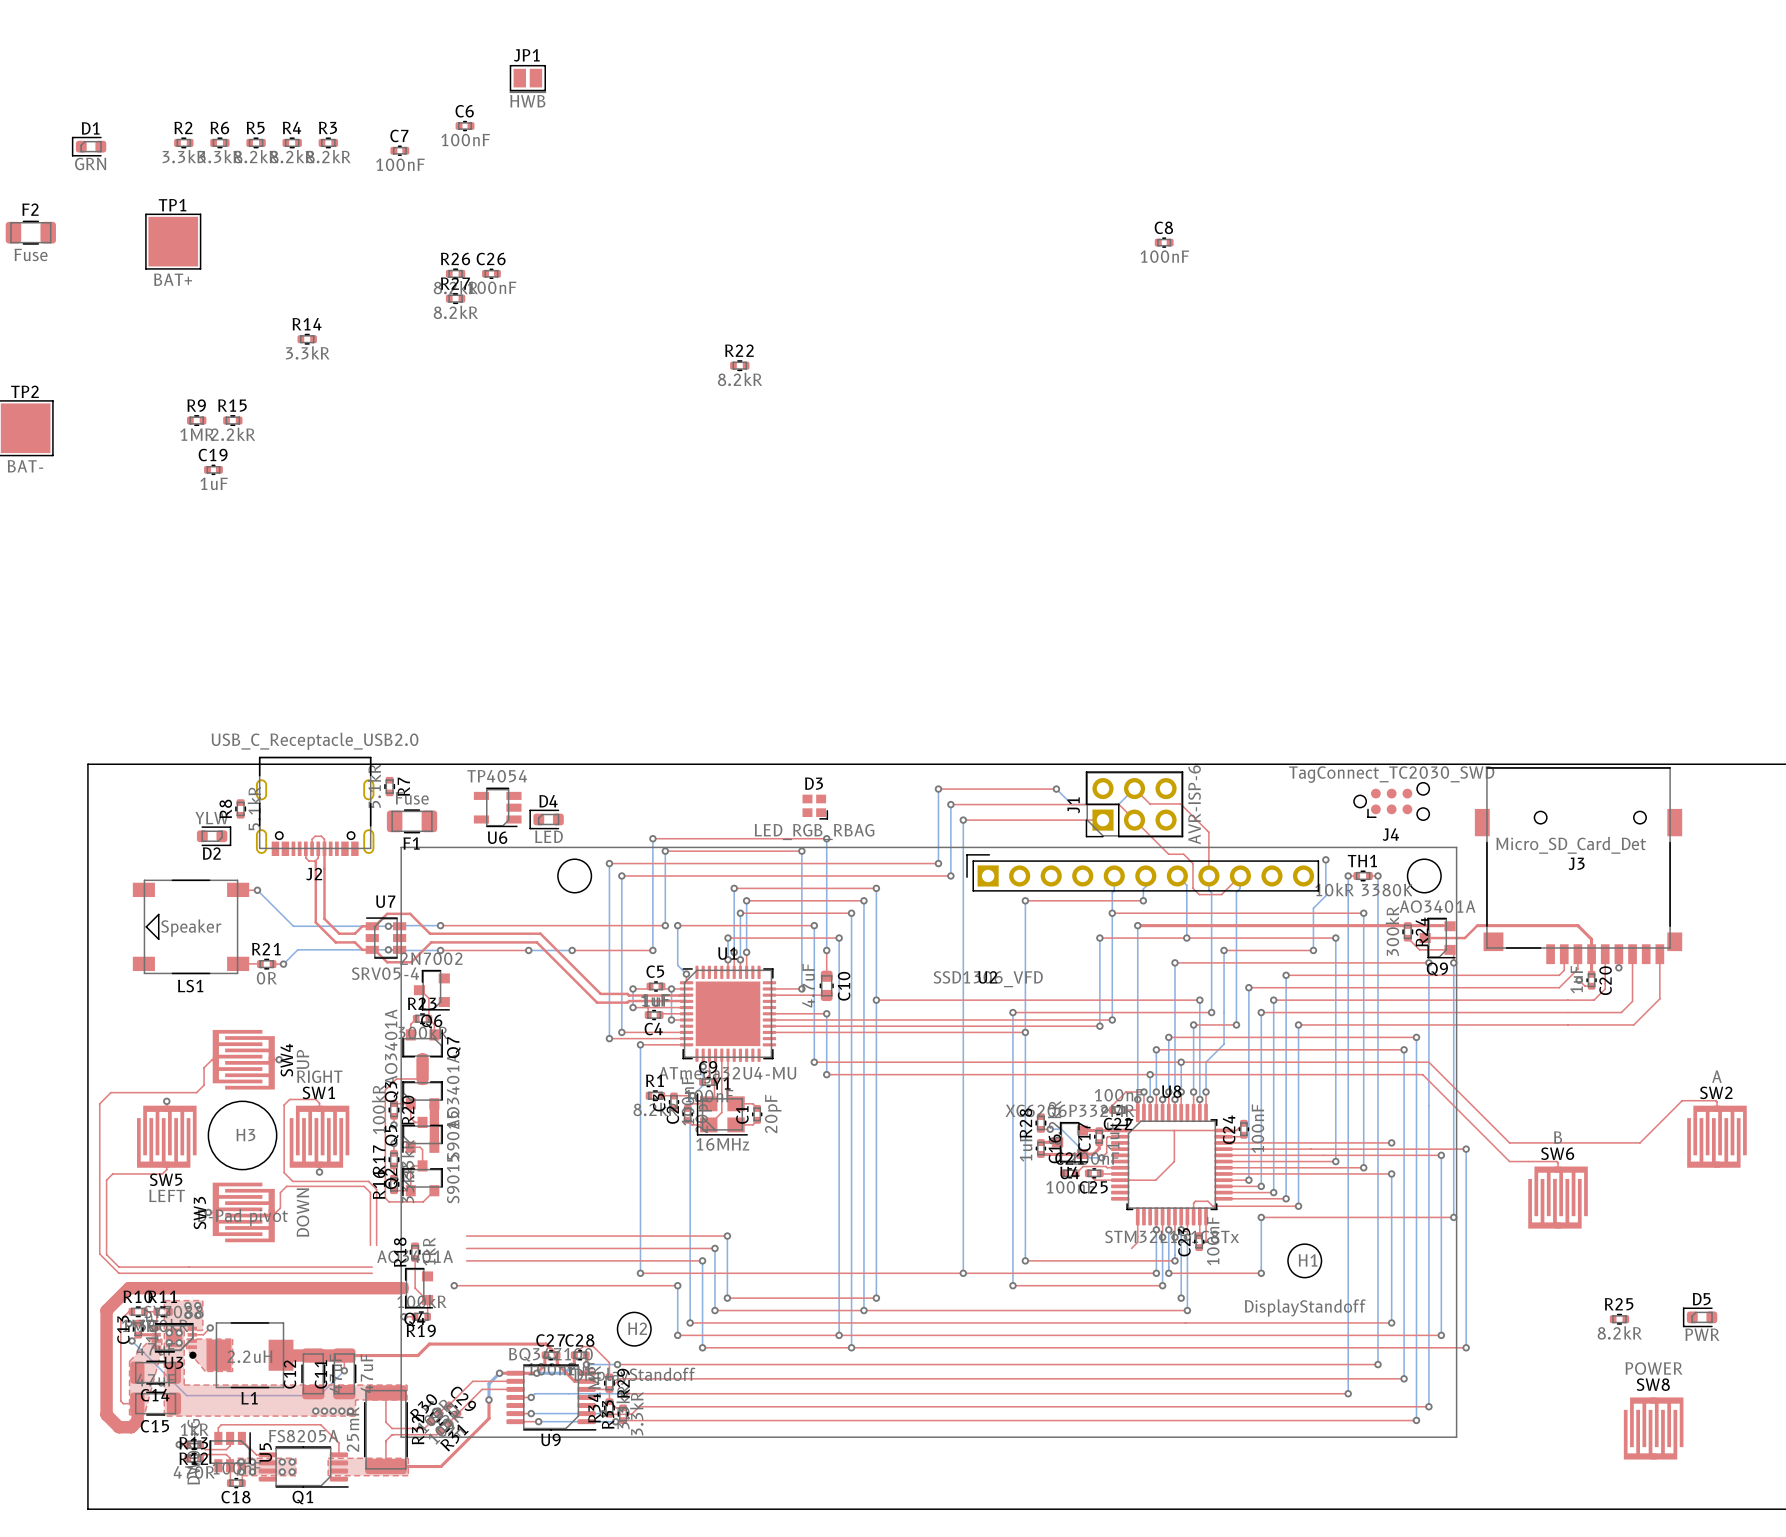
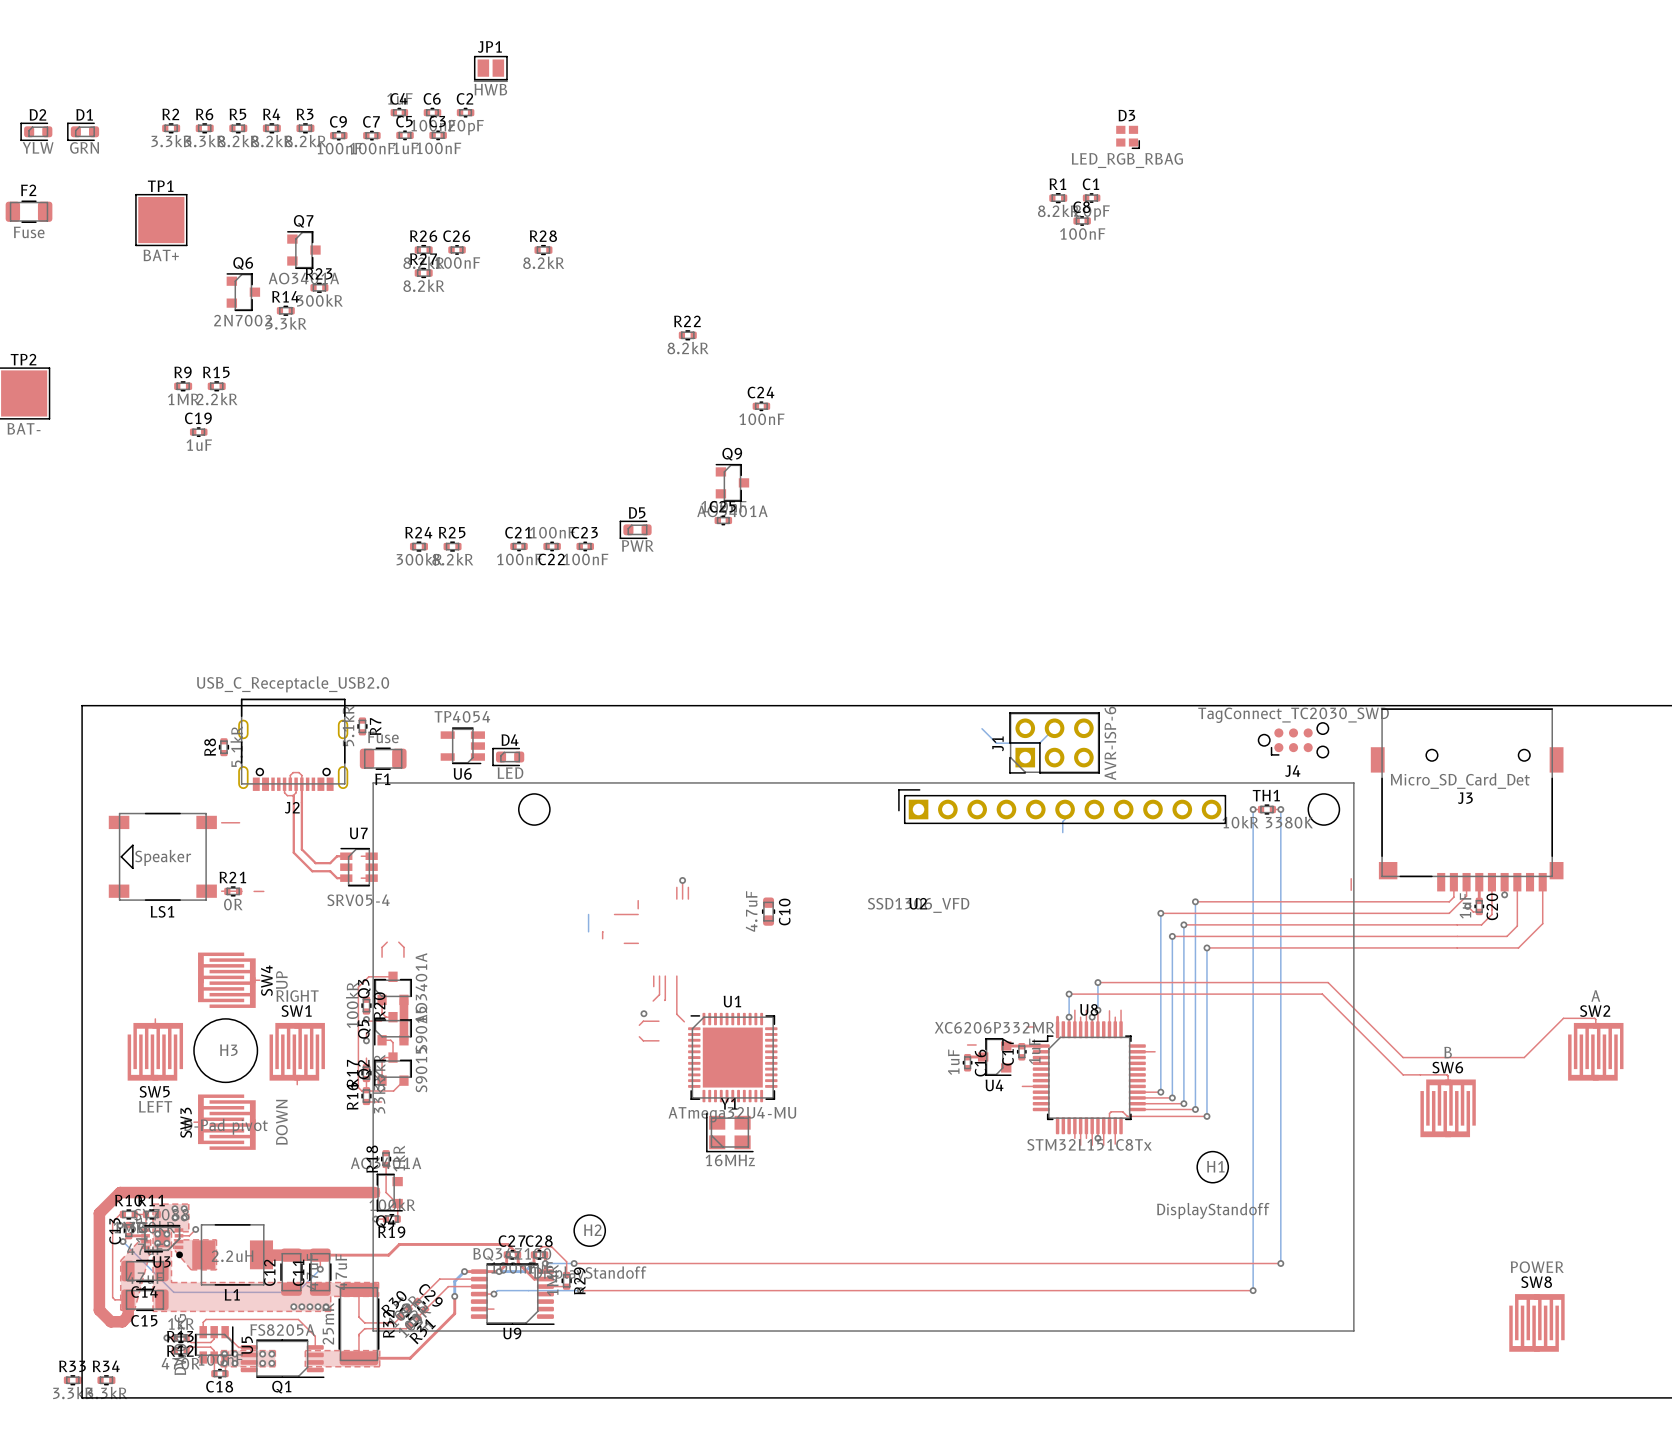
top track: (1134, 788) (1149, 803) (1180, 803) (1208, 832) (1208, 875) -> none
top track: (938, 789) (1056, 789) -> none
bottom track: (938, 789) (938, 863) -> none
via: (938, 789) -> none
via: (1056, 789) -> none
top track: (950, 804) (1119, 804) (1168, 854) (1183, 854) (1193, 863) (1193, 888) (1199, 894) (1221, 894) (1240, 875) -> none
bottom track: (950, 804) (950, 875) -> none
via: (950, 804) -> none
D3 position: (815, 807) -> (1128, 137)
top track: (963, 820) (1102, 820) -> none
bottom track: (963, 820) (963, 1273) -> none
via: (963, 820) -> none
D2 rotation: 0° (214, 836) -> 180° (36, 131)
D2 position: (214, 836) -> (36, 131)
top track: (652, 838) (826, 838) -> none
bottom track: (652, 838) (652, 950) -> none
via: (652, 838) -> none
bottom track: (826, 838) (826, 950) -> none
via: (826, 838) -> none
top track: (665, 851) (801, 851) -> none
bottom track: (665, 851) (665, 925) -> none
via: (665, 851) -> none
bottom track: (801, 851) (801, 988) -> none
via: (801, 851) -> none
bottom track: (1325, 859) (1325, 895) (1313, 908) (1313, 950) -> none
via: (1325, 859) -> none
top track: (609, 863) (938, 863) -> none
bottom track: (609, 863) (609, 1038) -> none
via: (609, 863) -> none
via: (938, 863) -> none
top track: (621, 875) (950, 875) -> none
bottom track: (621, 875) (621, 1032) -> none
via: (621, 875) -> none
via: (950, 875) -> none
bottom track: (1114, 875) (1114, 890) (1112, 892) (1112, 1020) -> none
bottom track: (1177, 875) (1186, 885) (1186, 938) -> none
bottom track: (1208, 875) (1208, 890) (1211, 892) (1211, 1012) -> none
bottom track: (1240, 875) (1240, 888) (1236, 892) (1236, 1024) -> none
top track: (734, 888) (876, 888) -> none
bottom track: (734, 888) (734, 952) -> none
via: (734, 888) -> none
bottom track: (876, 888) (876, 1298) -> none
via: (876, 888) -> none
bottom track: (257, 890) (293, 926) (440, 925) -> none
via: (257, 890) -> none
top track: (746, 900) (863, 900) -> none
bottom track: (746, 900) (746, 952) -> none
via: (746, 900) -> none
bottom track: (863, 900) (863, 1310) -> none
via: (863, 900) -> none
top track: (1025, 900) (1143, 900) -> none
bottom track: (1025, 900) (1025, 1260) -> none
via: (1025, 900) -> none
via: (1143, 900) -> none
top track: (740, 913) (851, 913) -> none
bottom track: (740, 913) (740, 959) -> none
via: (740, 913) -> none
bottom track: (851, 913) (851, 1347) -> none
via: (851, 913) -> none
top track: (1112, 913) (1363, 913) -> none
via: (1112, 913) -> none
bottom track: (1363, 913) (1363, 1167) -> none
via: (1363, 913) -> none
top track: (440, 925) (665, 925) -> none
via: (440, 925) -> none
via: (665, 925) -> none
top track: (677, 925) (814, 925) -> none
bottom track: (677, 925) (677, 965) (686, 974) -> none
via: (677, 925) -> none
bottom track: (814, 925) (814, 1062) -> none
via: (814, 925) -> none
top track: (1137, 925) (1450, 926) -> none
bottom track: (1137, 925) (1137, 1099) -> none
via: (1137, 925) -> none
LS1 position: (191, 926) -> (162, 856)
top track: (372, 926) (374, 926) (387, 913) (410, 913) (430, 933) (540, 933) (600, 993) (687, 995) -> none
via: (388, 926) -> none
R24 rotation: 0° (1407, 931) -> 90° clockwise (418, 546)
R24 position: (1407, 931) -> (418, 546)
top track: (728, 938) (839, 938) -> none
bottom track: (728, 938) (728, 959) -> none
via: (728, 938) -> none
bottom track: (839, 938) (839, 1335) -> none
via: (839, 938) -> none
top track: (1099, 938) (1335, 938) -> none
bottom track: (1099, 938) (1099, 1026) -> none
via: (1099, 938) -> none
via: (1186, 938) -> none
bottom track: (1335, 938) (1335, 1161) -> none
via: (1335, 938) -> none
top track: (1407, 938) (1419, 949) (1450, 949) -> none
top track: (1425, 938) (1464, 938) (1477, 925) (1577, 925) (1591, 939) (1591, 954) -> none
Q9 rotation: 0° (1437, 938) -> 180° (732, 482)
Q9 position: (1437, 938) -> (732, 482)
top track: (372, 949) (374, 949) (387, 962) (411, 962) (431, 942) (536, 942) (597, 1002) (686, 1001) -> none
via: (388, 949) -> none
top track: (440, 950) (528, 950) -> none
bottom track: (440, 950) (297, 949) (283, 964) -> none
via: (440, 950) -> none
bottom track: (528, 950) (572, 950) -> none
via: (528, 950) -> none
top track: (572, 950) (652, 950) -> none
via: (572, 950) -> none
via: (652, 950) -> none
top track: (826, 950) (826, 976) -> none
via: (826, 950) -> none
top track: (1224, 950) (1313, 950) -> none
bottom track: (1224, 950) (1224, 1044) (1206, 1062) (1206, 1092) -> none
via: (1224, 950) -> none
via: (1313, 950) -> none
top track: (746, 952) (746, 972) -> none
via: (746, 952) -> none
via: (728, 959) -> none
via: (740, 959) -> none
top track: (1175, 962) (1428, 962) -> none
bottom track: (1175, 962) (1175, 1099) -> none
via: (1175, 962) -> none
bottom track: (1428, 962) (1428, 1406) -> none
via: (1428, 962) -> none
bottom track: (1453, 962) (1453, 1217) -> none
via: (1453, 962) -> none
R21 position: (266, 964) -> (233, 891)
via: (283, 964) -> none
via: (686, 974) -> none
C5 position: (656, 986) -> (405, 135)
top track: (633, 988) (650, 988) -> none
via: (633, 988) -> none
bottom track: (671, 988) (671, 1020) -> none
via: (671, 988) -> none
top track: (769, 988) (801, 988) -> none
via: (801, 988) -> none
top track: (420, 990) (428, 998) (428, 1018) -> none
Q6 rotation: 0° (431, 990) -> 180° (243, 292)
Q6 position: (431, 990) -> (243, 292)
top track: (769, 995) (826, 995) -> none
top track: (876, 1000) (1199, 1000) -> none
via: (876, 1000) -> none
bottom track: (1199, 1000) (1199, 1099) -> none
via: (1199, 1000) -> none
top track: (633, 1007) (686, 1007) -> none
via: (633, 1007) -> none
top track: (1012, 1012) (1211, 1012) -> none
bottom track: (1012, 1012) (1012, 1285) -> none
via: (1012, 1012) -> none
via: (1211, 1012) -> none
top track: (660, 1013) (686, 1013) -> none
U1 position: (728, 1013) -> (732, 1057)
top track: (769, 1013) (826, 1013) -> none
bottom track: (826, 1013) (826, 1074) -> none
via: (826, 1013) -> none
C4 position: (654, 1015) -> (399, 112)
R23 position: (422, 1018) -> (319, 287)
via: (671, 1020) -> none
top track: (769, 1020) (1112, 1020) -> none
via: (1112, 1020) -> none
top track: (1193, 1024) (1236, 1024) -> none
bottom track: (1193, 1024) (1193, 1092) -> none
via: (1193, 1024) -> none
via: (1236, 1024) -> none
top track: (769, 1026) (1099, 1026) -> none
via: (1099, 1026) -> none
C4 name position: C4 (653, 1029) -> C4 (398, 98)
top track: (621, 1032) (686, 1032) -> none
via: (621, 1032) -> none
top track: (769, 1032) (1025, 1032) -> none
via: (1025, 1032) -> none
top track: (1168, 1037) (1416, 1037) -> none
bottom track: (1168, 1037) (1168, 1092) -> none
via: (1168, 1037) -> none
bottom track: (1416, 1037) (1416, 1420) -> none
via: (1416, 1037) -> none
top track: (609, 1038) (686, 1038) -> none
via: (609, 1038) -> none
top track: (640, 1044) (686, 1044) -> none
bottom track: (640, 1044) (640, 1273) -> none
via: (640, 1044) -> none
Q7 rotation: 0° (422, 1047) -> 90° counterclockwise (303, 250)
Q7 position: (422, 1047) -> (303, 250)
top track: (1156, 1049) (1404, 1049) -> none
bottom track: (1156, 1049) (1156, 1092) -> none
via: (1156, 1049) -> none
bottom track: (1404, 1049) (1404, 1378) -> none
via: (1404, 1049) -> none
top track: (721, 1055) (721, 1112) (708, 1125) -> none
top track: (215, 1059) (212, 1059) (204, 1067) (204, 1085) (196, 1092) (110, 1092) (99, 1103) (99, 1254) (118, 1273) (372, 1273) -> none
via: (279, 1059) -> none
top track: (422, 1059) (422, 1078) (396, 1078) (385, 1090) -> (393, 976) (368, 976) (358, 987) (358, 1008)
top track: (814, 1062) (1181, 1062) -> none
via: (814, 1062) -> none
bottom track: (703, 1066) (703, 1085) (690, 1098) (690, 1322) -> none
via: (703, 1066) -> none
top track: (826, 1074) (1150, 1074) -> none
via: (826, 1074) -> none
C9 position: (708, 1082) -> (338, 135)
top track: (714, 1082) (714, 1104) -> none
Q3 position: (422, 1091) -> (393, 988)
via: (1143, 1092) -> none
via: (1156, 1092) -> none
via: (1168, 1092) -> none
via: (1193, 1092) -> none
via: (1206, 1092) -> none
R1 position: (655, 1095) -> (1058, 198)
top track: (661, 1095) (692, 1095) -> none
via: (1137, 1099) -> none
via: (1162, 1099) -> none
via: (1199, 1099) -> none
via: (166, 1101) -> none
C3 rotation: 0° (674, 1101) -> 90° clockwise (438, 135)
C3 position: (674, 1101) -> (438, 135)
top track: (410, 1103) (410, 1118) (415, 1122) (422, 1122) -> (382, 999) (382, 1013) (386, 1017) (393, 1017)
top track: (736, 1103) (752, 1103) (757, 1108) -> none
top track: (319, 1108) (319, 1103) (315, 1099) (289, 1099) (284, 1105) (284, 1172) (292, 1181) (368, 1181) (376, 1189) (376, 1245) -> none
R20 position: (394, 1110) -> (366, 1005)
via: (1104, 1110) -> none
top track: (1112, 1110) (1112, 1105) (1125, 1092) (1143, 1092) (1143, 1112) -> none
C22 position: (1118, 1110) -> (552, 546)
top track: (1124, 1110) (1137, 1110) -> none
C2 rotation: 0° (687, 1114) -> 90° clockwise (465, 112)
C2 position: (687, 1114) -> (465, 112)
Y1 position: (722, 1114) -> (729, 1132)
C1 rotation: 0° (757, 1114) -> 90° clockwise (1091, 198)
C1 position: (757, 1114) -> (1091, 198)
top track: (757, 1120) (752, 1124) (736, 1124) -> none
R28 rotation: 0° (1040, 1123) -> 90° clockwise (543, 250)
R28 position: (1040, 1123) -> (543, 250)
top track: (1243, 1123) (1236, 1130) (1120, 1130) -> none
top track: (434, 1124) (434, 1147) -> (403, 999) (403, 1021)
bottom track: (1050, 1129) (1061, 1129) (1089, 1157) (1101, 1157) -> none
via: (1050, 1129) -> none
C24 rotation: 0° (1243, 1129) -> 90° clockwise (761, 406)
C24 position: (1243, 1129) -> (761, 406)
top track: (1174, 1130) (1174, 1161) (1155, 1180) (1094, 1180) (1088, 1173) -> none
Q5 position: (422, 1134) -> (393, 1028)
top track: (1120, 1136) (1106, 1137) (1106, 1152) (1101, 1157) -> none
top track: (1099, 1142) (1099, 1148) (1093, 1154) (1082, 1154) -> none
top track: (1223, 1142) (1391, 1142) -> none
via: (1391, 1142) -> none
via position: (394, 1143) -> (366, 1019)
top track: (410, 1147) (420, 1147) (422, 1149) (422, 1165) (413, 1165) (410, 1169) (410, 1190) -> (381, 1040) (390, 1040) (393, 1042) (393, 1057) (384, 1057) (382, 1060) (382, 1080)
top track: (1223, 1149) (1466, 1149) -> none
bottom track: (1466, 1149) (1466, 1347) -> none
via: (1466, 1149) -> none
top track: (1040, 1154) (1082, 1154) -> none
top track: (1223, 1155) (1441, 1155) -> none
bottom track: (1441, 1155) (1441, 1335) -> none
via: (1441, 1155) -> none
via: (1101, 1157) -> none
top track: (1223, 1161) (1335, 1161) -> none
via: (1335, 1161) -> none
top track: (166, 1164) (166, 1169) (162, 1173) (112, 1173) (106, 1180) (106, 1254) (118, 1267) (372, 1267) -> none
top track: (1120, 1167) (1083, 1166) (1076, 1173) -> none
top track: (1223, 1167) (1363, 1167) -> none
via: (1363, 1167) -> none
via: (319, 1172) -> none
C21 position: (1070, 1173) -> (519, 546)
C25 position: (1094, 1173) -> (723, 520)
top track: (1223, 1173) (1391, 1173) -> none
bottom track: (1391, 1173) (1391, 1322) -> none
via: (1391, 1173) -> none
top track: (385, 1175) (385, 1198) (389, 1201) (423, 1201) (434, 1190) -> (358, 1087) (361, 1091) (393, 1091) (403, 1080)
Q2 position: (422, 1178) -> (393, 1069)
C25 name position: C25 (1093, 1187) -> C25 (722, 506)
via: (208, 1212) -> none
top track: (271, 1212) (276, 1212) (280, 1208) (280, 1192) (286, 1186) (364, 1186) (370, 1192) (370, 1245) -> none
top track: (1137, 1216) (1137, 1242) (1131, 1248) -> none
top track: (1206, 1216) (1206, 1241) (1199, 1247) -> none
top track: (1261, 1217) (1453, 1217) -> none
bottom track: (1261, 1217) (1261, 1273) -> none
via: (1261, 1217) -> none
via: (1453, 1217) -> none
bottom track: (1156, 1229) (1156, 1273) -> none
via: (1156, 1229) -> none
bottom track: (1168, 1229) (1168, 1273) -> none
via: (1168, 1229) -> none
bottom track: (1181, 1229) (1181, 1298) -> none
top track: (466, 1236) (727, 1236) -> none
bottom track: (727, 1236) (727, 1298) -> none
via: (727, 1236) -> none
bottom track: (1162, 1237) (1162, 1285) -> none
via: (1162, 1237) -> none
bottom track: (1175, 1237) (1175, 1260) -> none
via: (1175, 1237) -> none
bottom track: (1187, 1237) (1187, 1310) -> none
via: (1187, 1237) -> none
C23 rotation: 0° (1199, 1241) -> 90° clockwise (585, 546)
C23 position: (1199, 1241) -> (585, 546)
top track: (466, 1248) (714, 1248) -> none
bottom track: (714, 1248) (714, 1310) -> none
via: (714, 1248) -> none
top track: (466, 1260) (702, 1260) -> none
via: (702, 1260) -> none
bottom track: (703, 1260) (702, 1347) -> none
top track: (1025, 1260) (1175, 1260) -> none
via: (1025, 1260) -> none
via: (1175, 1260) -> none
top track: (640, 1273) (1156, 1273) -> none
via: (640, 1273) -> none
via: (963, 1273) -> none
via: (1156, 1273) -> none
top track: (1168, 1273) (1261, 1273) -> none
via: (1168, 1273) -> none
via: (1261, 1273) -> none
top track: (454, 1285) (677, 1285) -> none
via: (454, 1285) -> none
bottom track: (677, 1285) (677, 1335) -> none
via: (677, 1285) -> none
top track: (1012, 1285) (1162, 1285) -> none
via: (1012, 1285) -> none
via: (1162, 1285) -> none
top track: (727, 1298) (876, 1298) -> none
via: (727, 1298) -> none
via: (876, 1298) -> none
via: (1181, 1298) -> none
top track: (714, 1310) (1187, 1310) -> none
via: (714, 1310) -> none
via: (863, 1310) -> none
via: (1187, 1310) -> none
D5 position: (1700, 1317) -> (635, 529)
R25 position: (1619, 1319) -> (452, 546)
top track: (690, 1322) (1391, 1322) -> none
via: (690, 1322) -> none
via: (1391, 1322) -> none
top track: (677, 1335) (1441, 1335) -> none
via: (677, 1335) -> none
via: (839, 1335) -> none
via: (1441, 1335) -> none
top track: (702, 1347) (1466, 1347) -> none
via: (702, 1347) -> none
via: (851, 1347) -> none
via: (1466, 1347) -> none
top track: (1404, 1378) (620, 1378) (609, 1389) (609, 1401) (616, 1407) (623, 1407) -> none
via: (1404, 1378) -> none
top track: (1428, 1406) (639, 1406) (631, 1414) (609, 1414) -> none
via: (1428, 1406) -> none
R34 rotation: 0° (609, 1408) -> 90° clockwise (106, 1380)
R34 position: (609, 1408) -> (106, 1380)
bottom track: (531, 1413) (603, 1413) -> none
via: (531, 1413) -> none
via: (603, 1413) -> none
R33 rotation: 0° (623, 1414) -> 90° clockwise (72, 1380)
R33 position: (623, 1414) -> (72, 1380)
top track: (623, 1420) (1416, 1420) -> none
via: (1416, 1420) -> none
top track: (515, 1421) (538, 1421) -> none
bottom track: (538, 1421) (615, 1421) -> none
via: (538, 1421) -> none
via: (615, 1421) -> none

